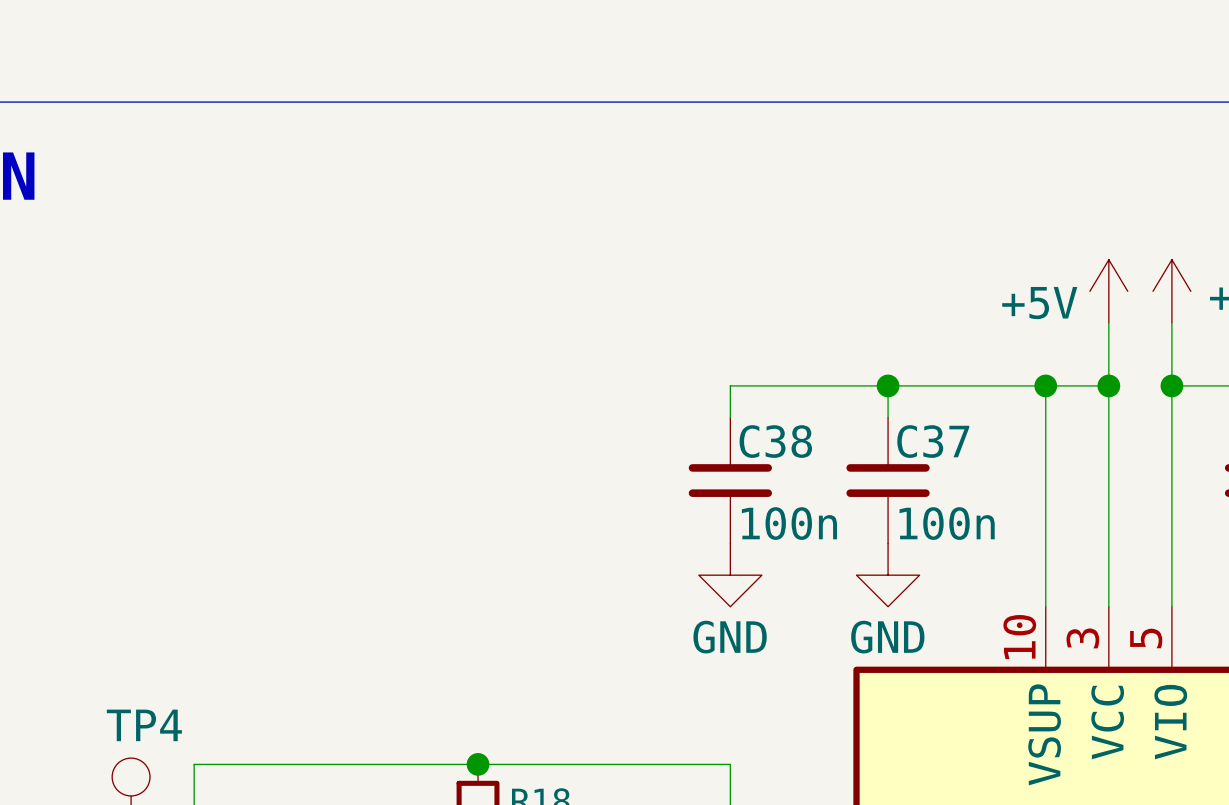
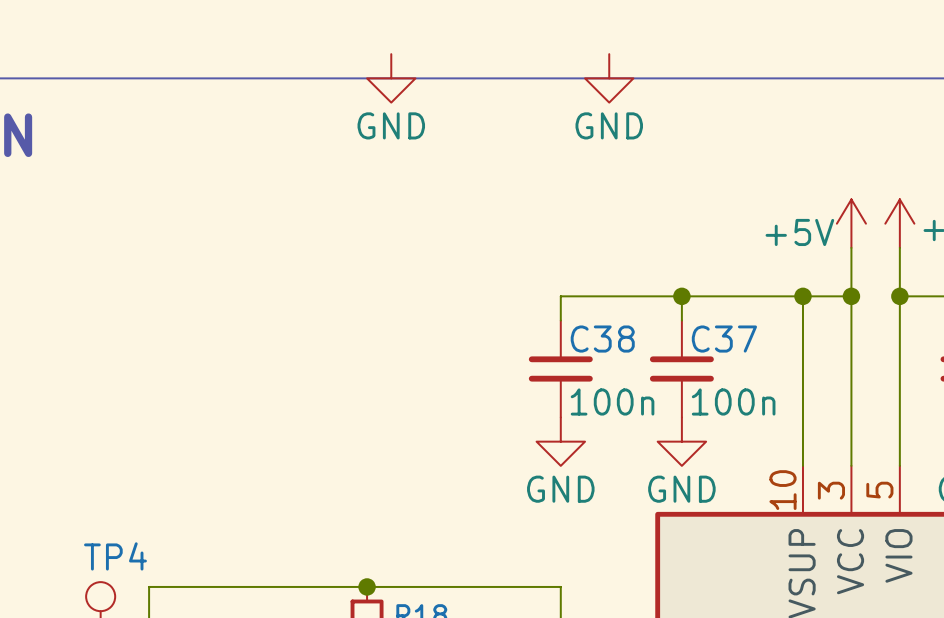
power symbol: none -> GND (391, 78)
power symbol: none -> GND (609, 78)

